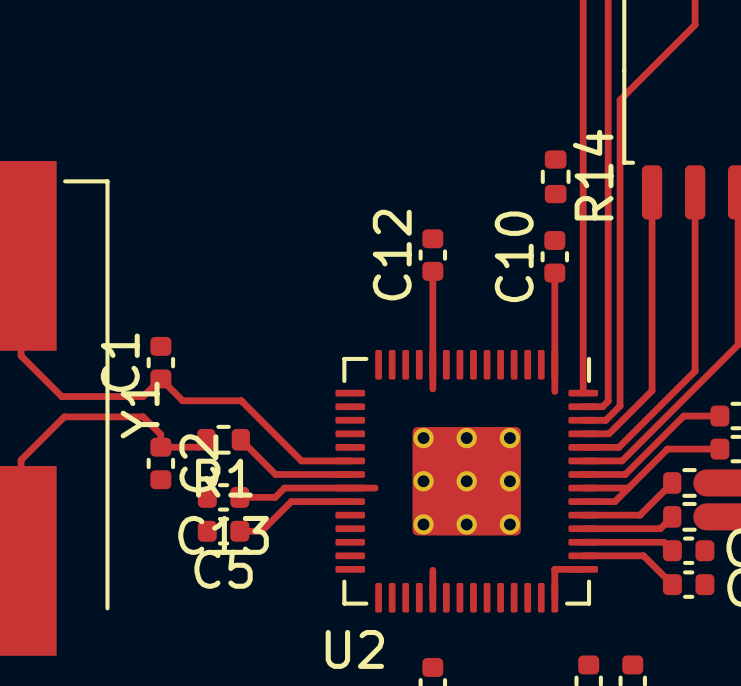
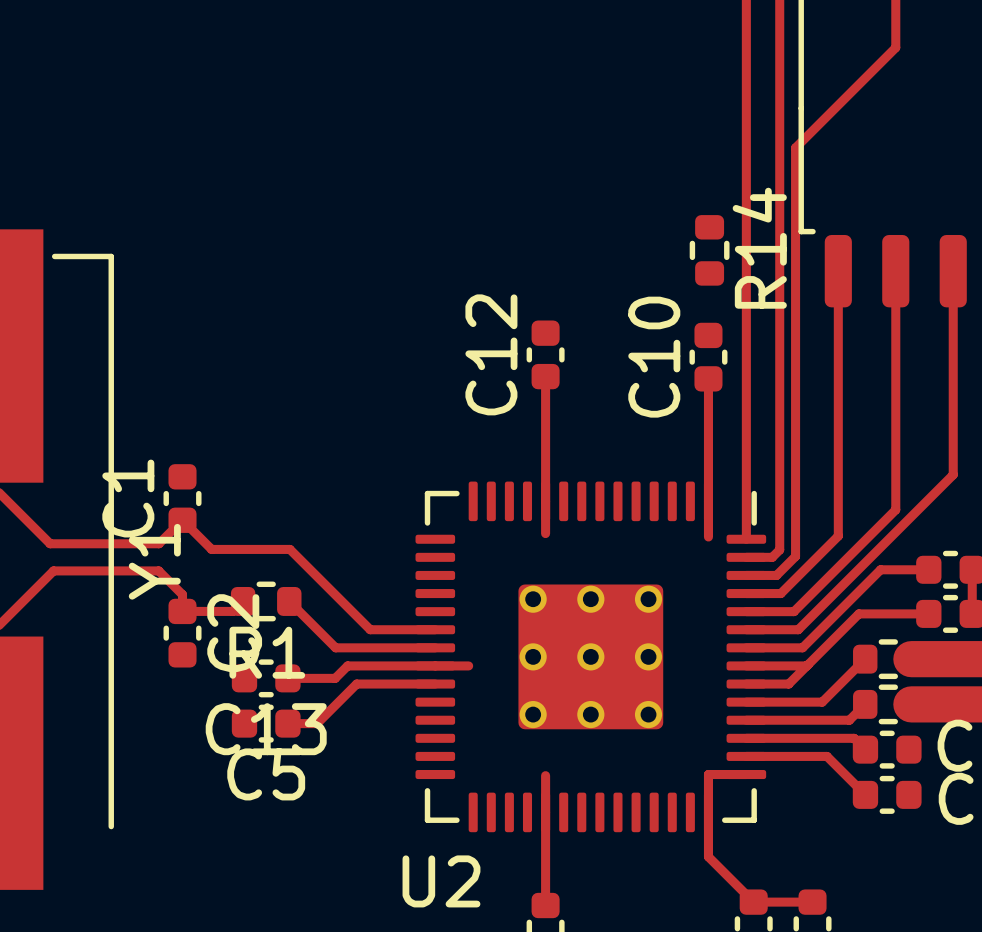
track: none -> (545, 812) (545, 902)
track: none -> (708, 812) (708, 856) (753, 902) (812, 902)

